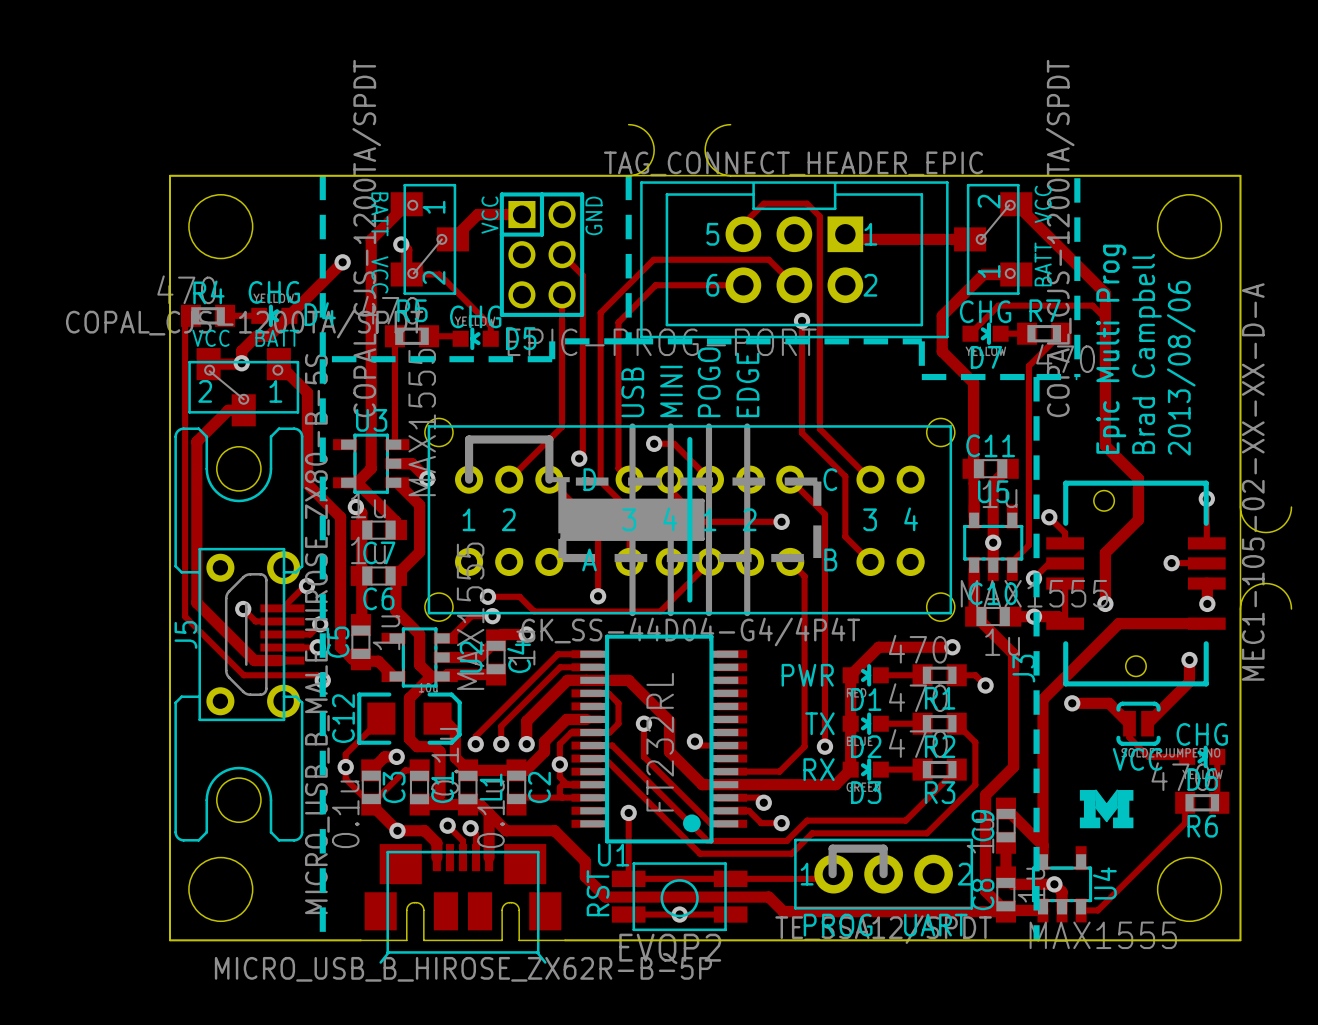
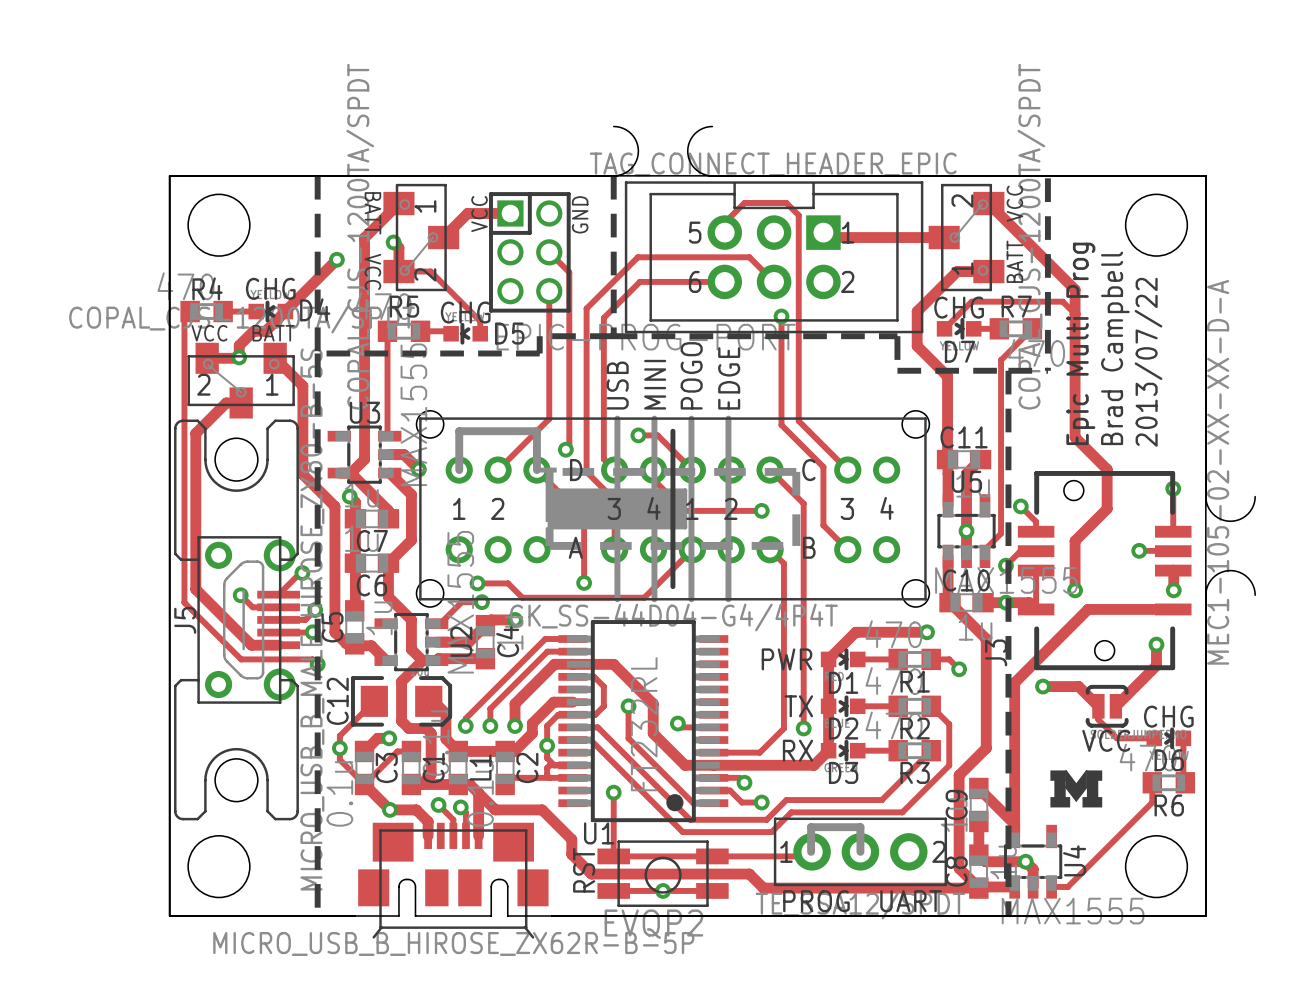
text: 2013/08/06 (1181, 368) -> 2013/07/22 (1148, 362)

